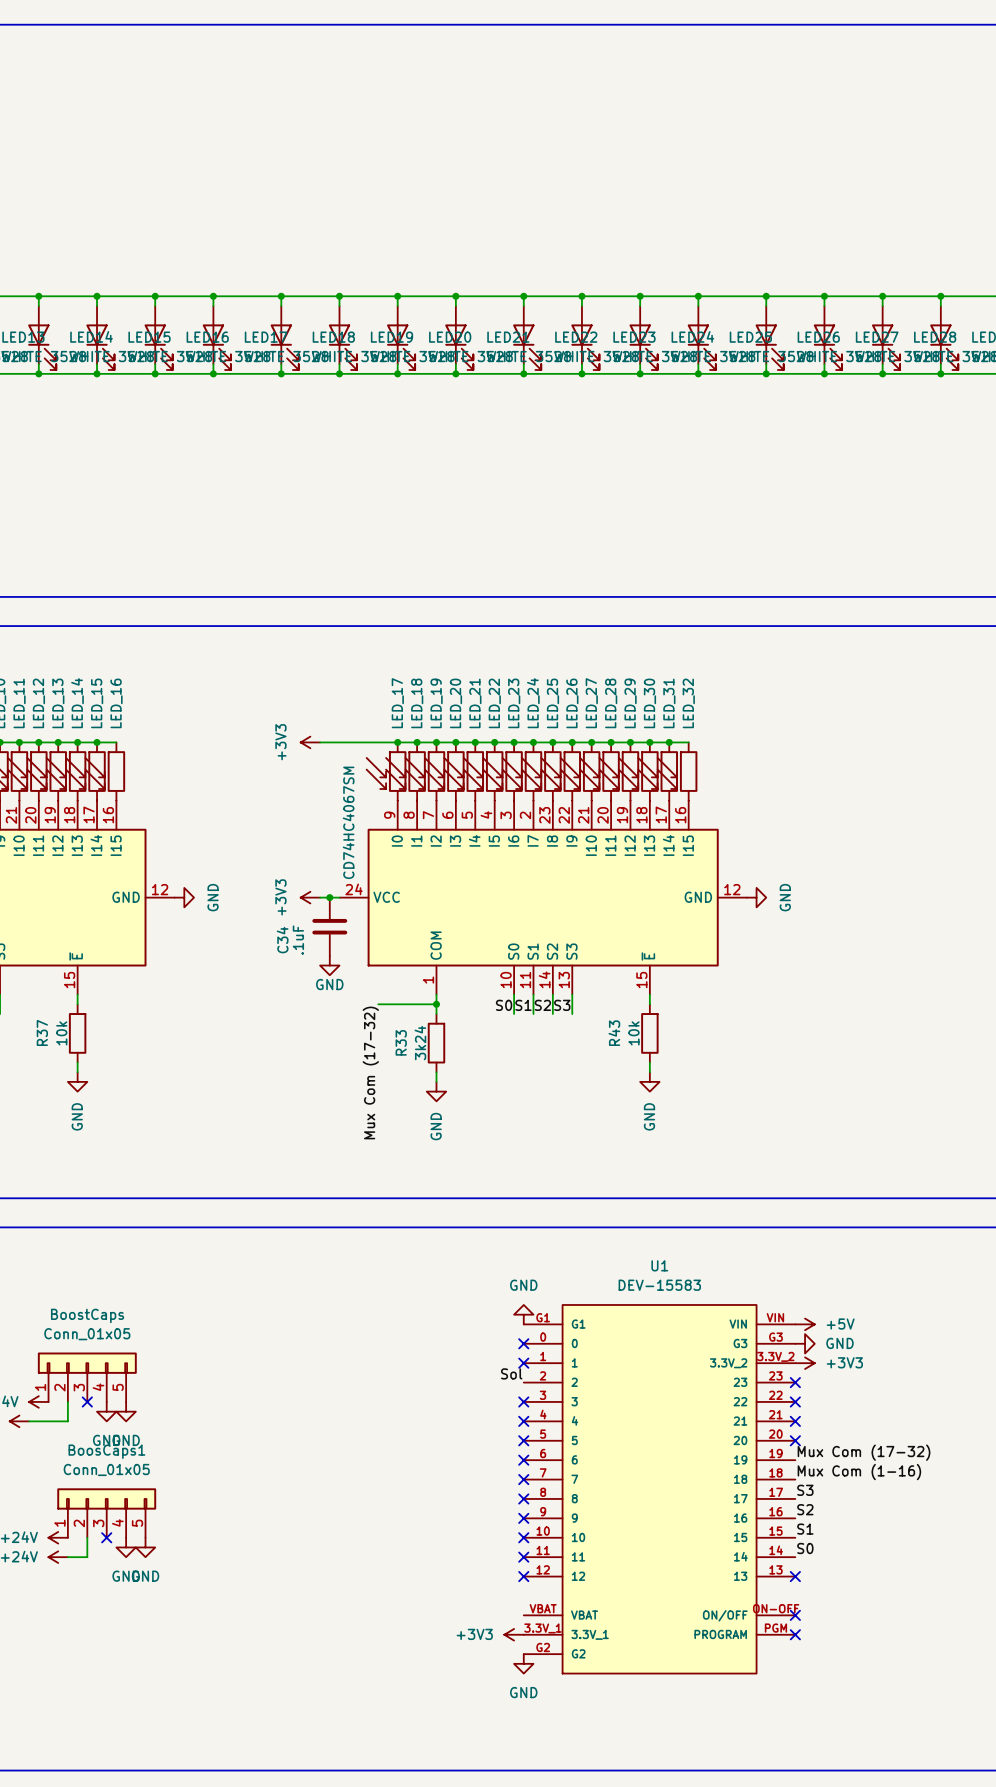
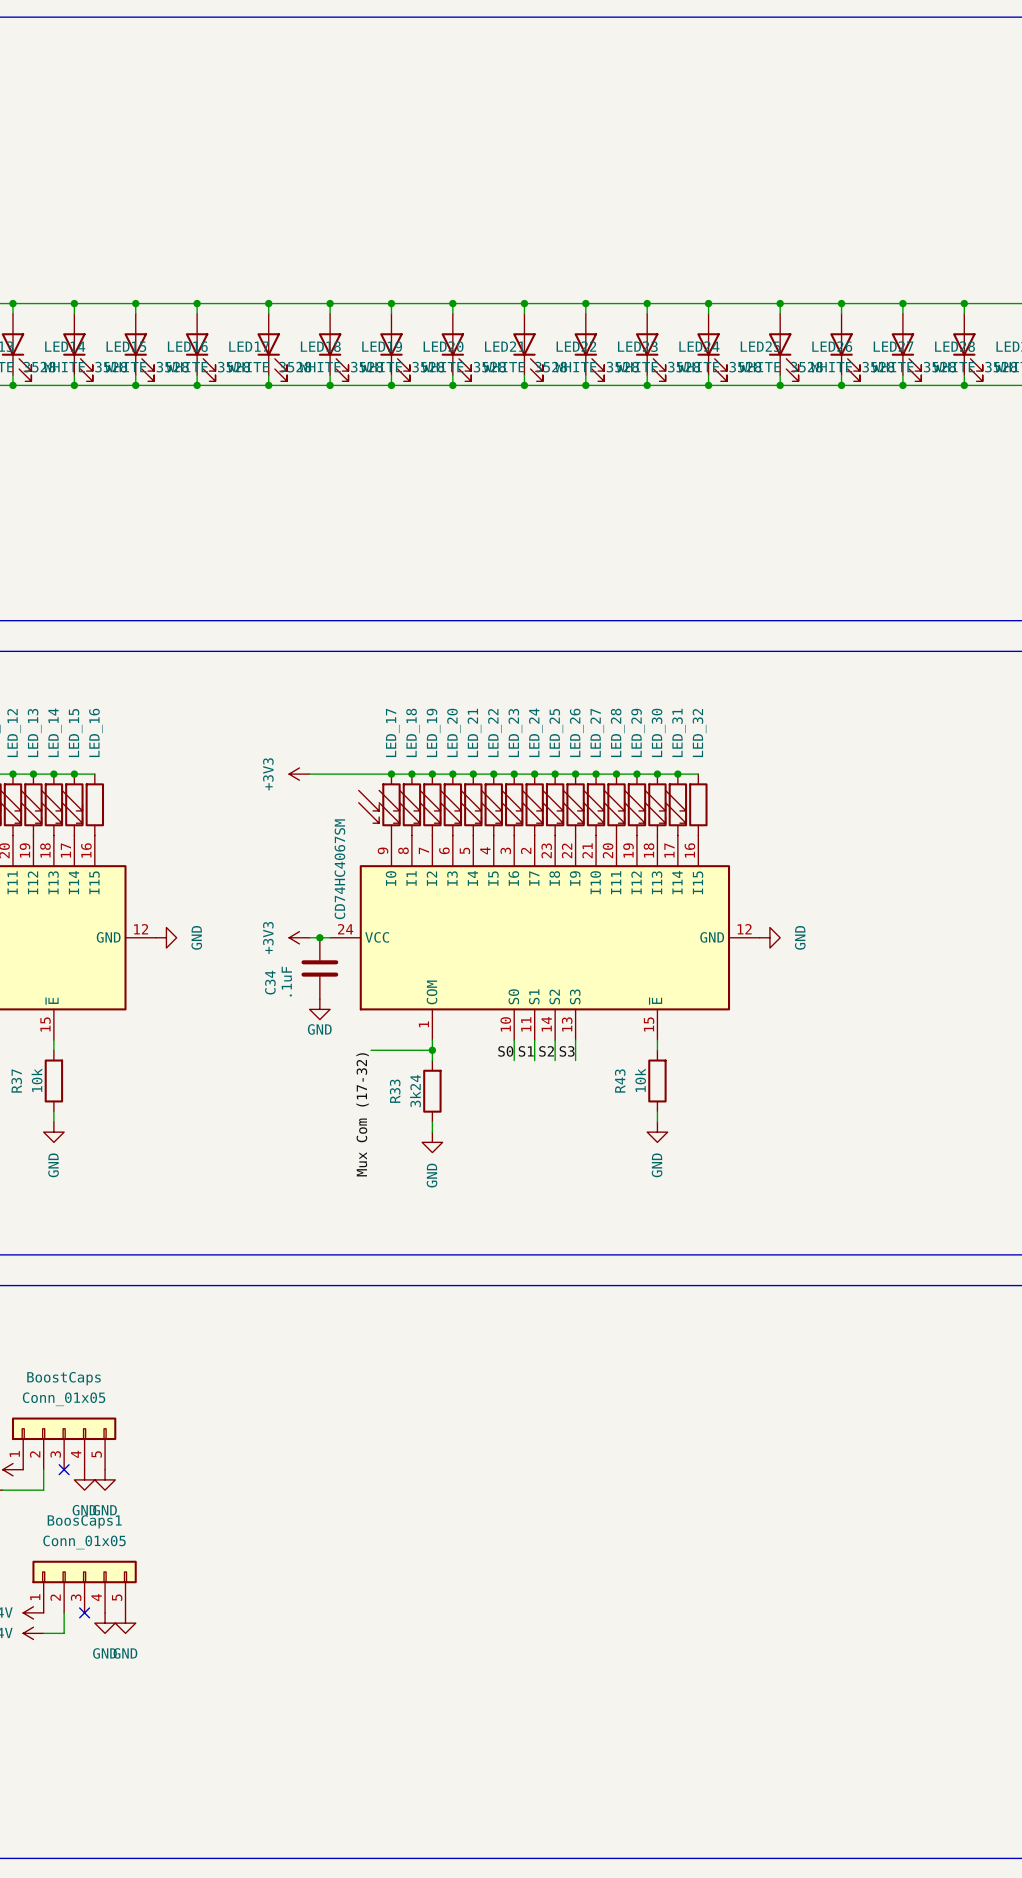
power symbol: GND (523, 1314) -> none
power symbol: +5V (805, 1324) -> none
no-connect mark: (523, 1343) -> none
power symbol: GND (805, 1343) -> none
no-connect mark: (523, 1363) -> none
power symbol: +3V3 (805, 1363) -> none
label: Sol (511, 1373) -> none
no-connect mark: (795, 1382) -> none
no-connect mark: (523, 1401) -> none
no-connect mark: (795, 1401) -> none
no-connect mark: (523, 1421) -> none
no-connect mark: (795, 1421) -> none
no-connect mark: (523, 1440) -> none
no-connect mark: (795, 1440) -> none
label: Mux Com (17-32) (864, 1452) -> none
no-connect mark: (523, 1460) -> none
label: Mux Com (1-16) (859, 1472) -> none
no-connect mark: (523, 1479) -> none
U1: DEV-15583 (659, 1489) -> none
label: S3 (805, 1490) -> none
no-connect mark: (523, 1498) -> none
label: S2 (805, 1509) -> none
no-connect mark: (523, 1518) -> none
label: S1 (805, 1529) -> none
no-connect mark: (523, 1537) -> none
label: S0 (805, 1548) -> none
no-connect mark: (523, 1557) -> none
no-connect mark: (523, 1576) -> none
no-connect mark: (795, 1576) -> none
no-connect mark: (795, 1615) -> none
power symbol: +3V3 (514, 1634) -> none
no-connect mark: (795, 1634) -> none
power symbol: GND (523, 1663) -> none

